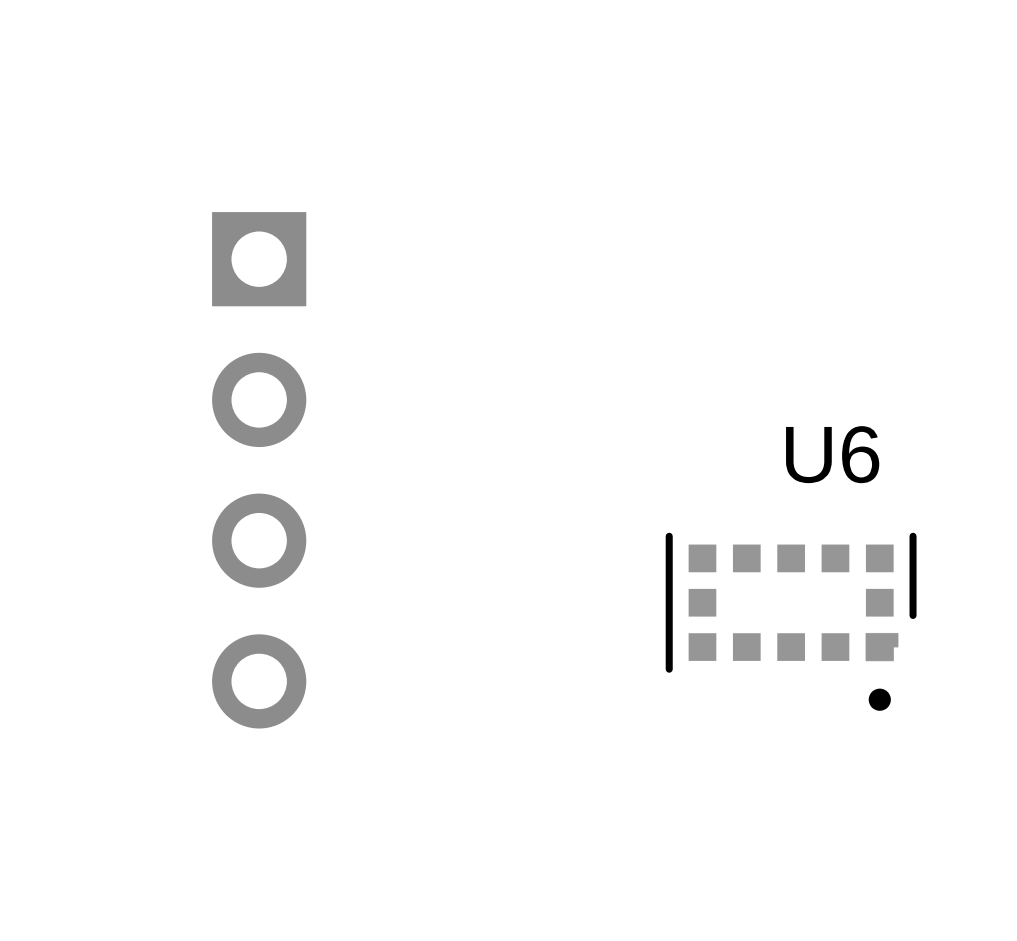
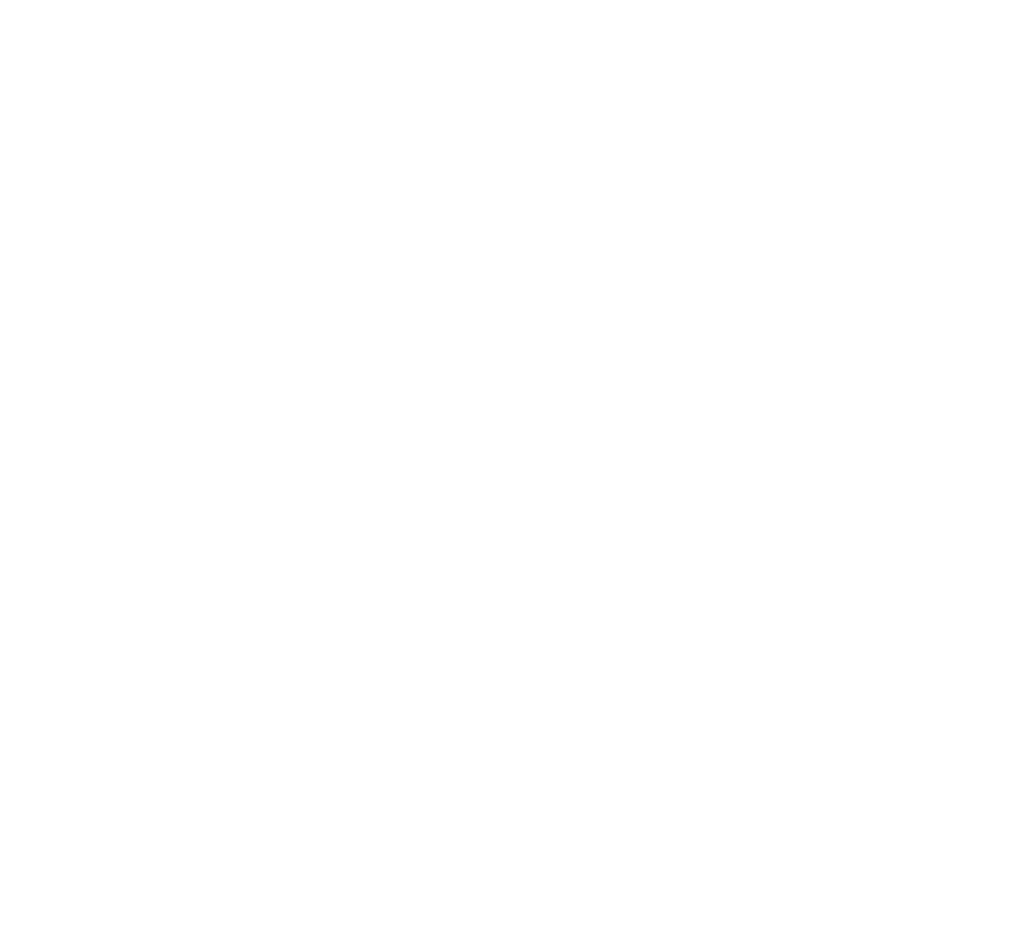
part: (259, 470) -> none
U6: (791, 621) -> none

